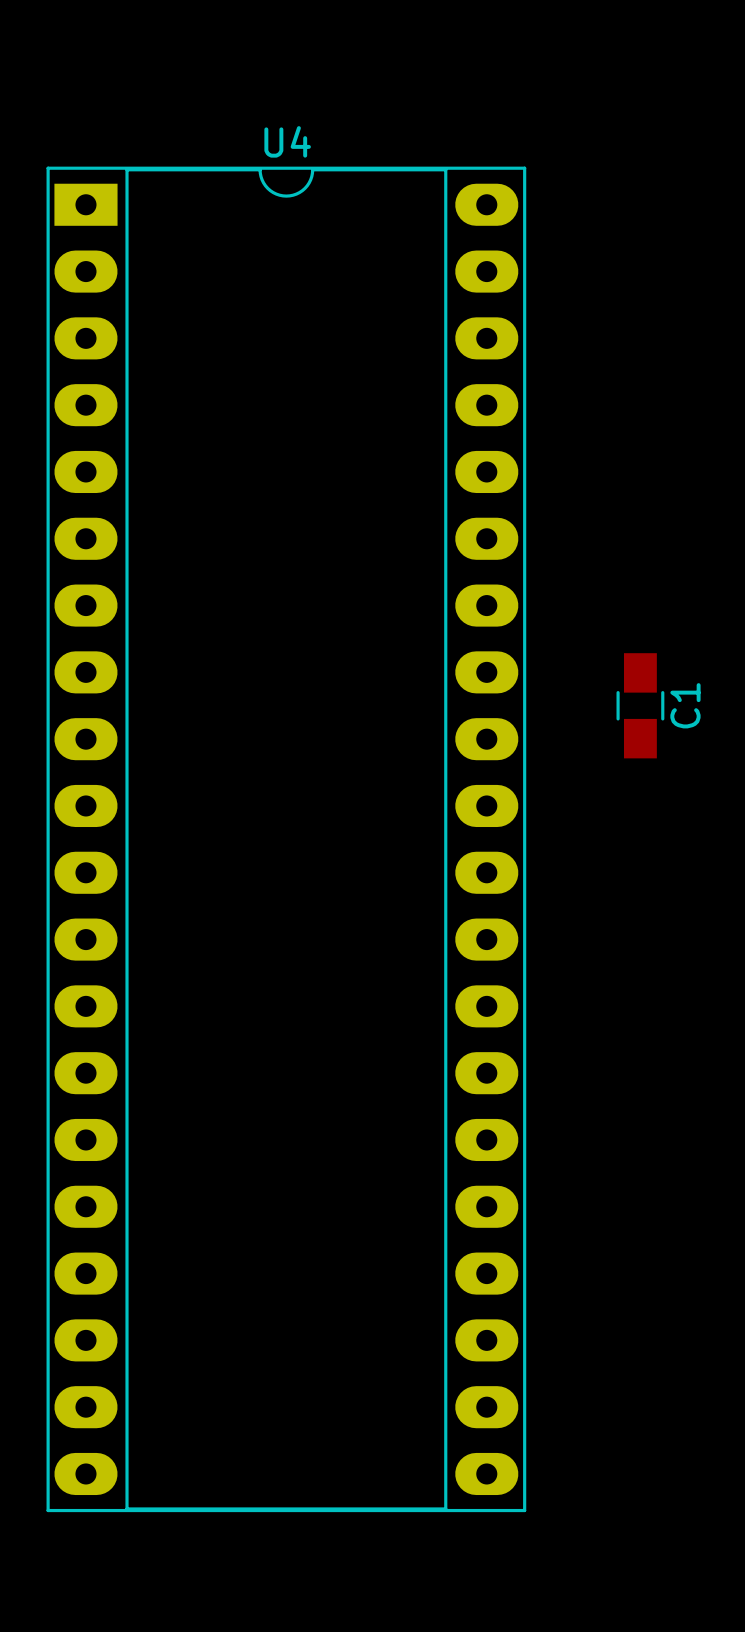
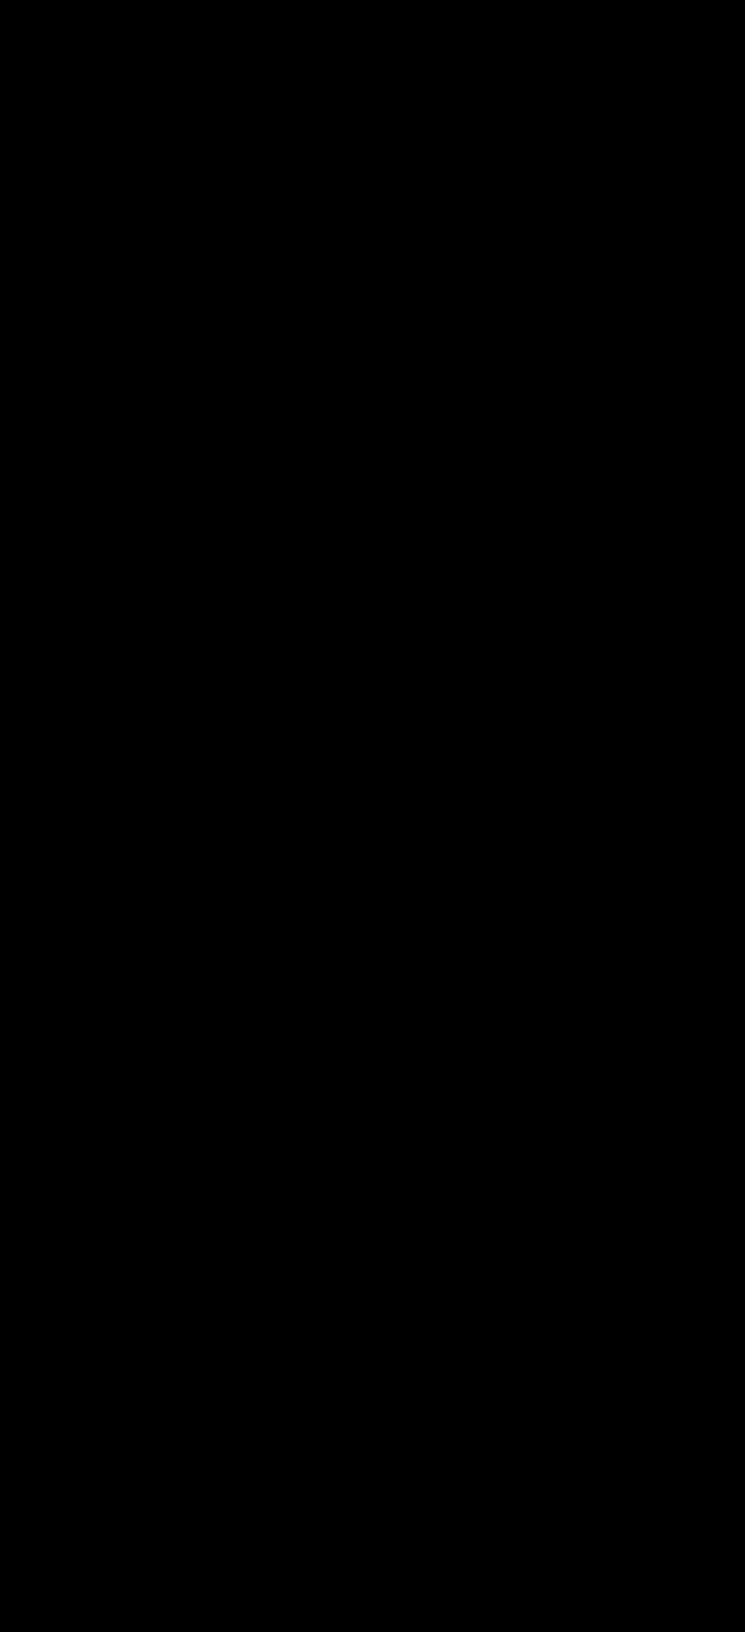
C1: (640, 705) -> none
U4: (286, 839) -> none

